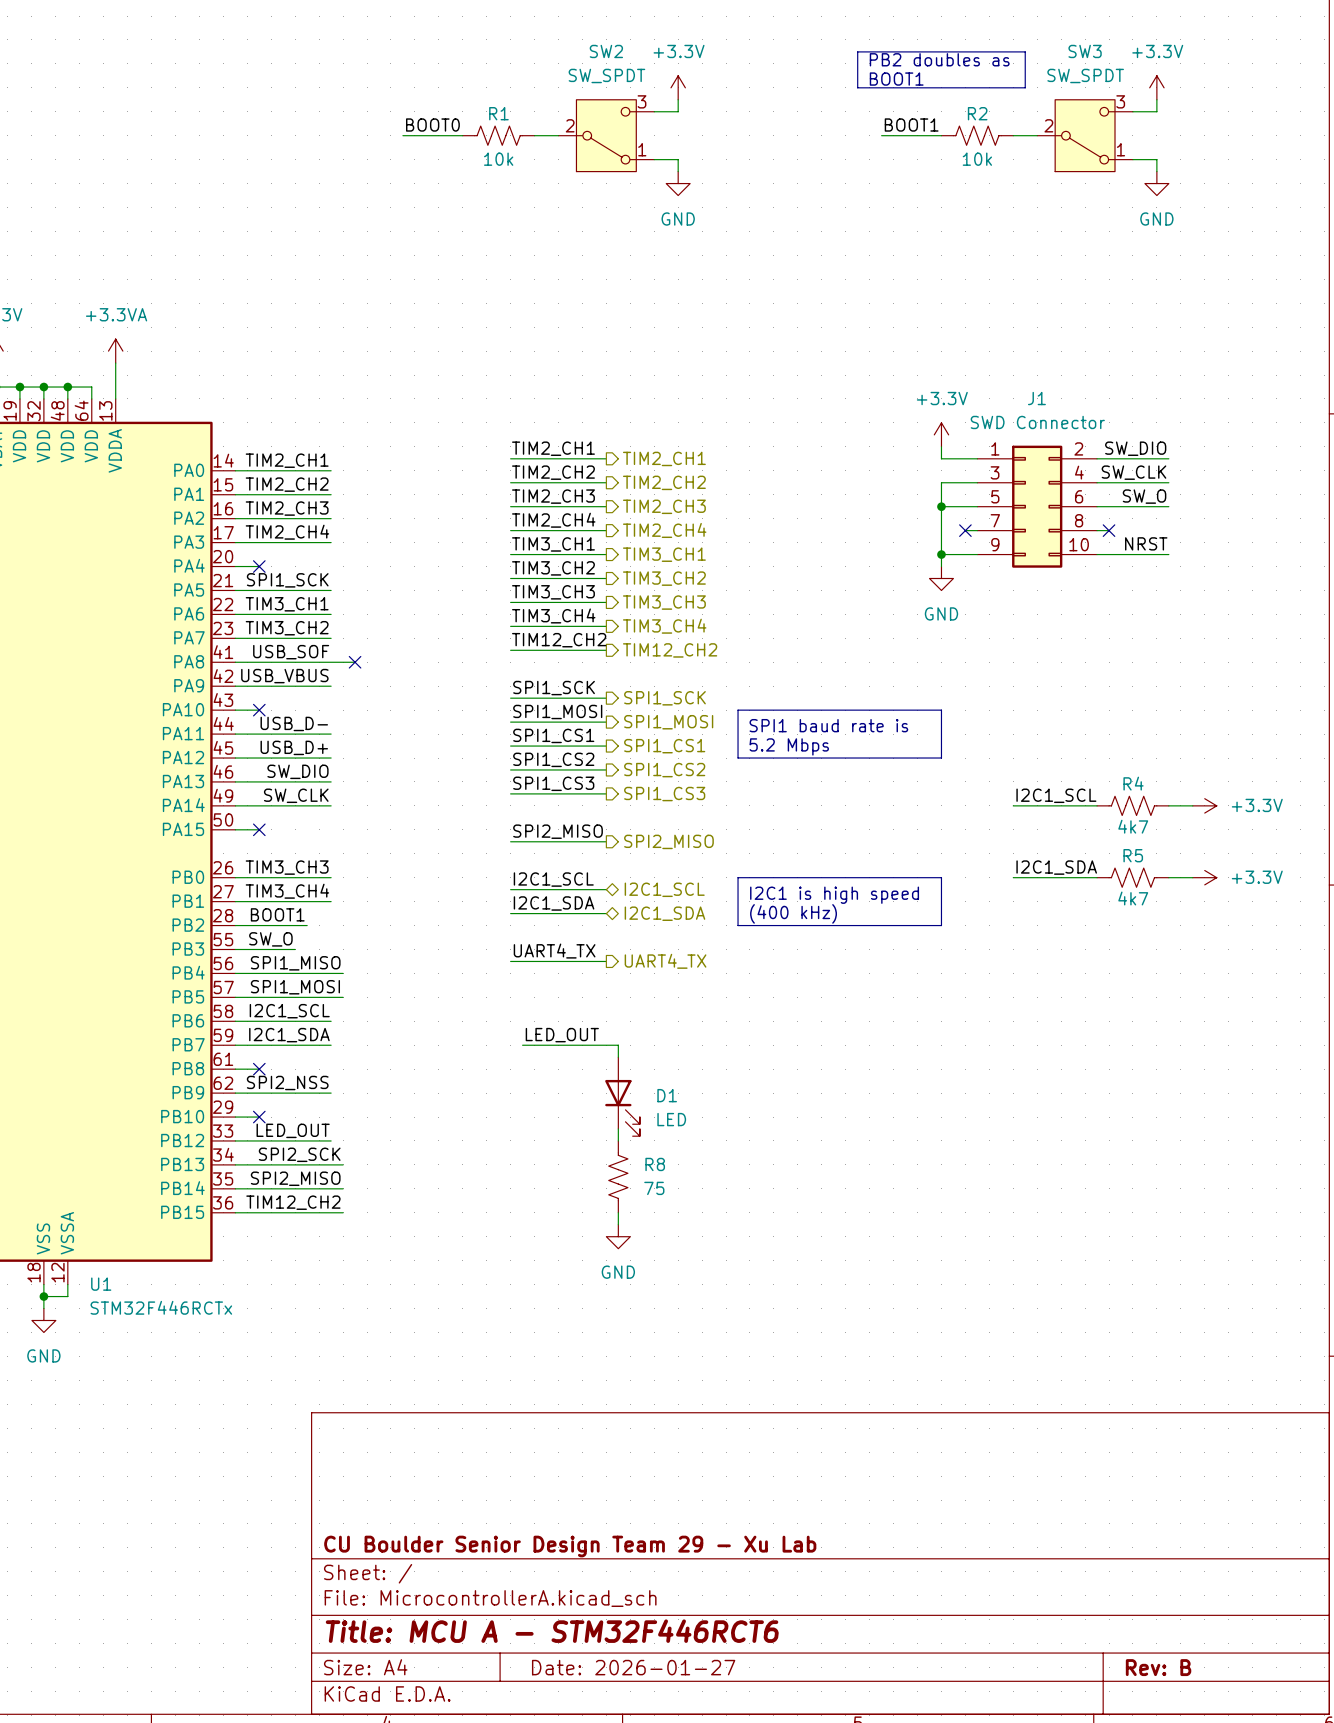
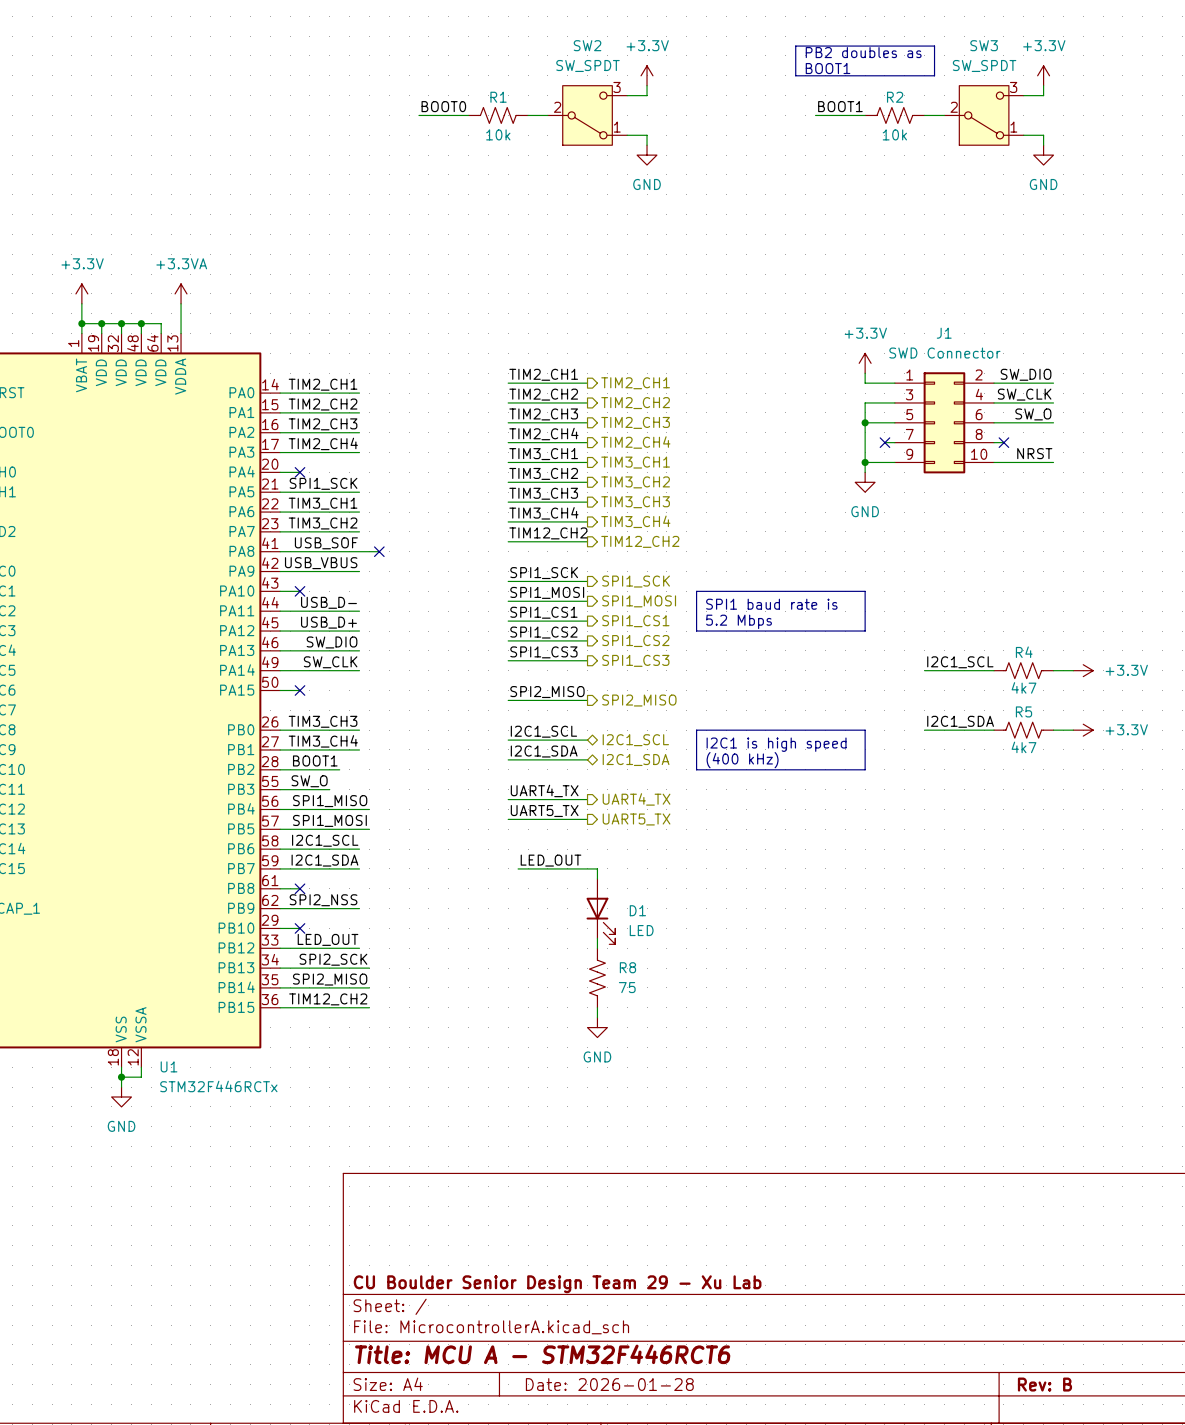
label: none -> UART5_TX (544, 811)
wire: none -> (508, 819) (587, 819)
hierarchical label: none -> UART5_TX (636, 819)
title block: Date: 2026-01-27 (633, 1667) -> Date: 2026-01-28 (609, 1384)

